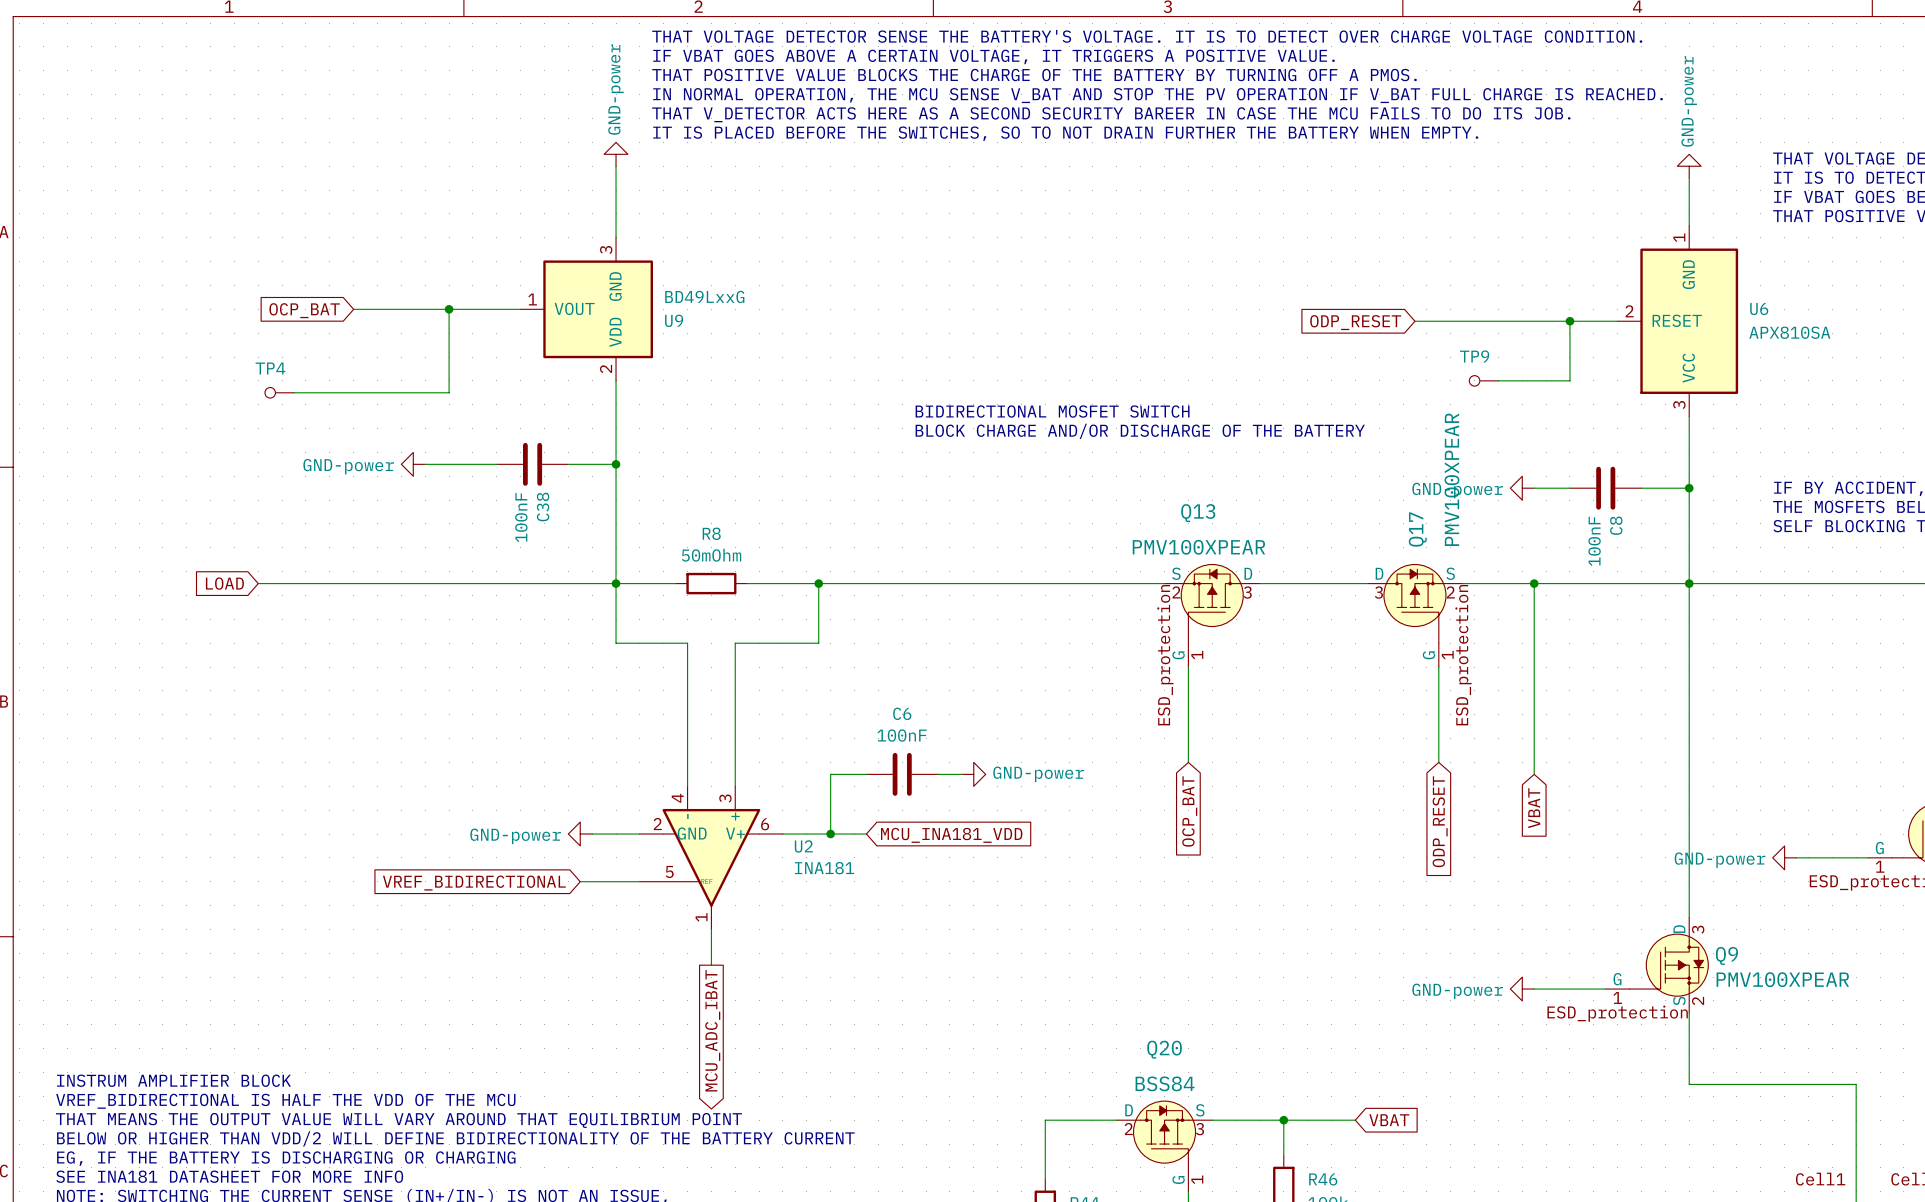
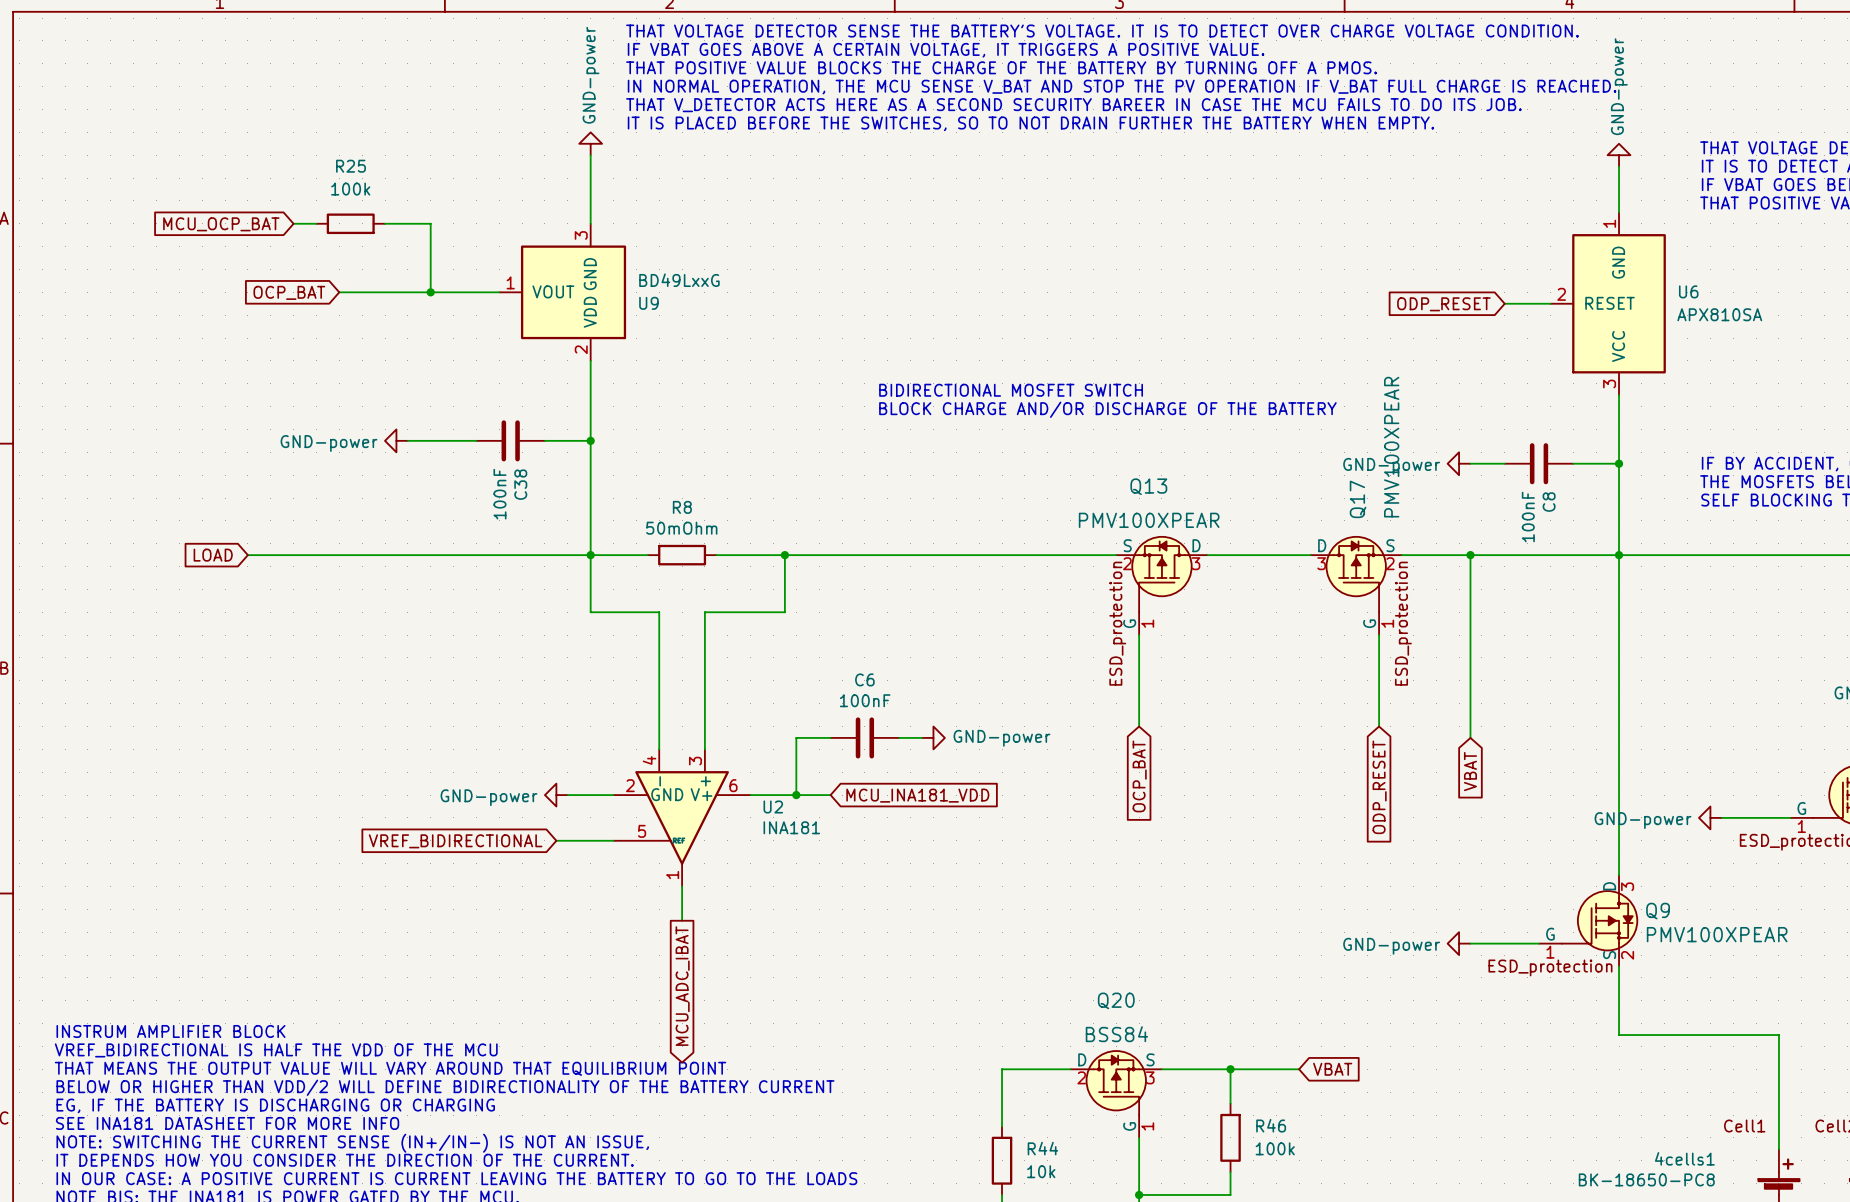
wire: none -> (293, 223) (316, 223)
R25: none -> 100k (350, 223)
global label: none -> MCU_OCP_BAT (221, 224)
wire: (449, 309) (449, 392) (294, 392) -> (430, 292) (430, 223) (385, 223)
wire: (1414, 321) (1569, 321) (1569, 380) (1498, 380) -> none
junction: (1569, 321) -> none
global label position: ODP_RESET (1355, 322) -> ODP_RESET (1443, 304)
TP9: (1483, 380) -> none
TP4: (279, 392) -> none

